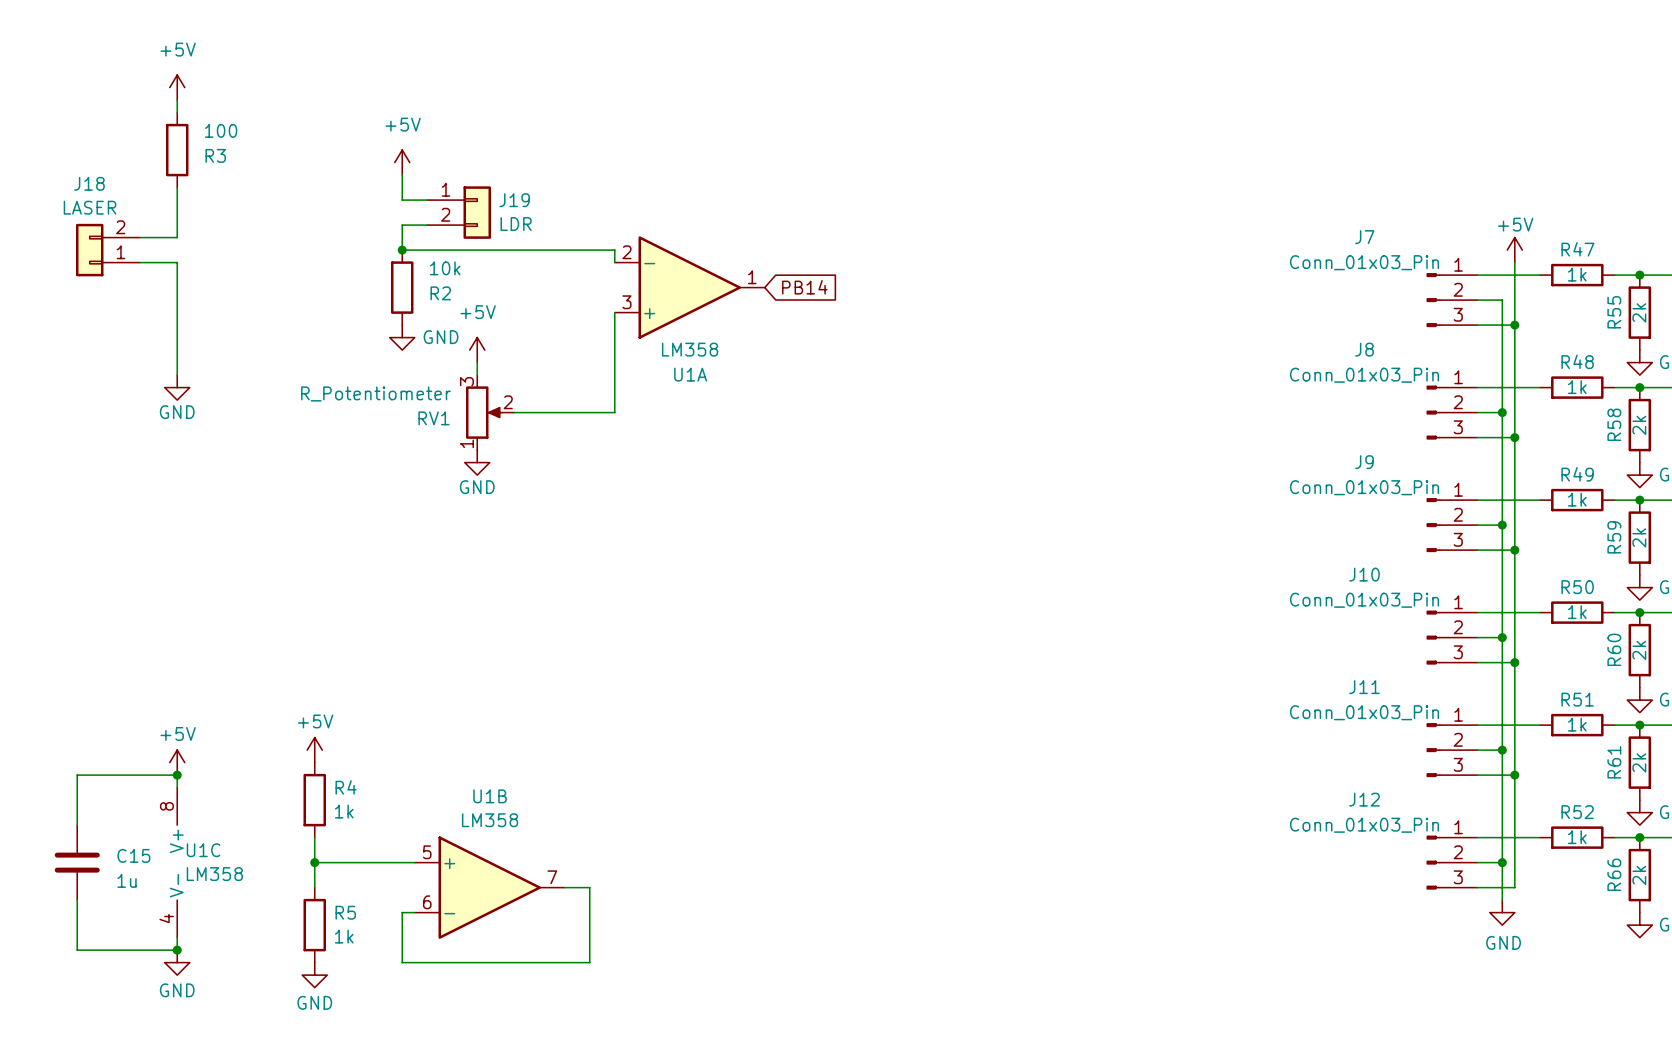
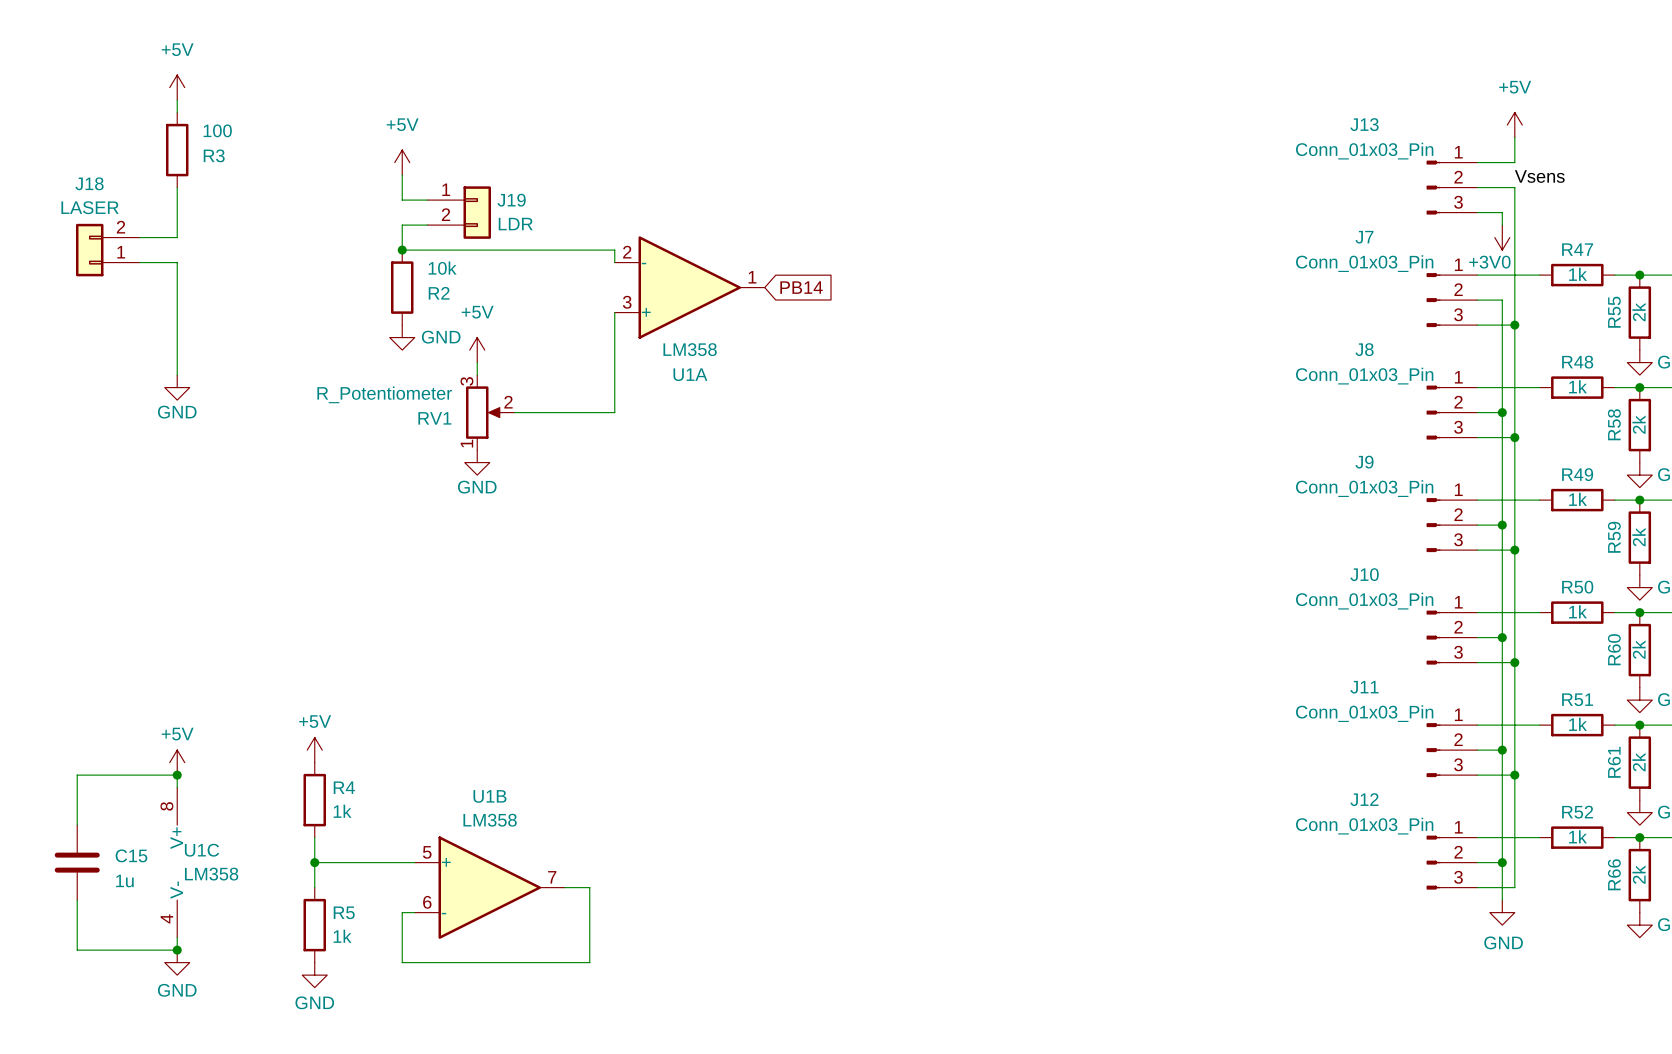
wire: none -> (1514, 137) (1514, 162) (1477, 162)
label: none -> Vsens (1539, 176)
J13: none -> Conn_01x03_Pin (1451, 187)
wire: none -> (1477, 187) (1514, 187) (1514, 262)
wire: none -> (1477, 212) (1502, 212) (1502, 225)
power symbol text position: +5V (1515, 224) -> +5V (1515, 87)
power symbol: none -> +3V0 (1502, 237)
power symbol position: +5V (1514, 250) -> +5V (1514, 125)

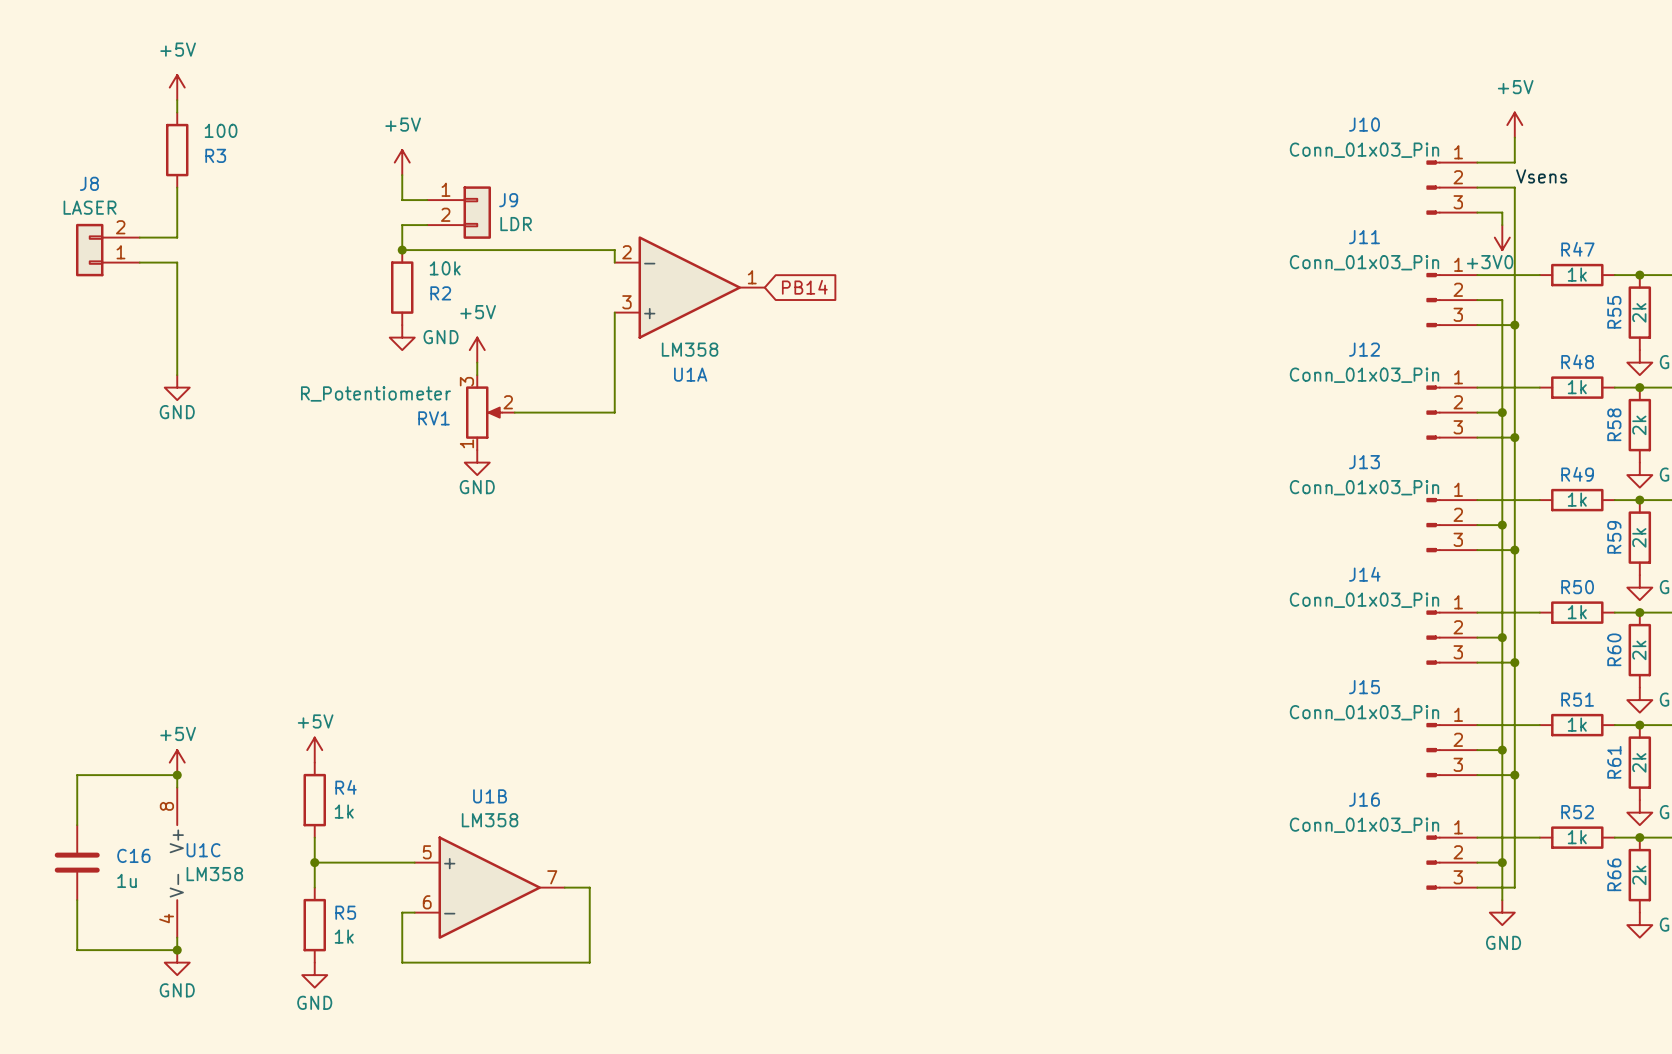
J13 name: J13 (1364, 124) -> J10 (1364, 124)
J18 name: J18 (89, 183) -> J8 (89, 183)
J19 name: J19 (511, 200) -> J9 (508, 200)
J7 name: J7 (1364, 237) -> J11 (1364, 237)
J8 name: J8 (1364, 349) -> J12 (1364, 349)
J9 name: J9 (1364, 462) -> J13 (1364, 462)
J10 name: J10 (1364, 574) -> J14 (1364, 574)
J11 name: J11 (1364, 687) -> J15 (1364, 687)
J12 name: J12 (1364, 799) -> J16 (1364, 799)
C15 name: C15 (131, 855) -> C16 (133, 855)

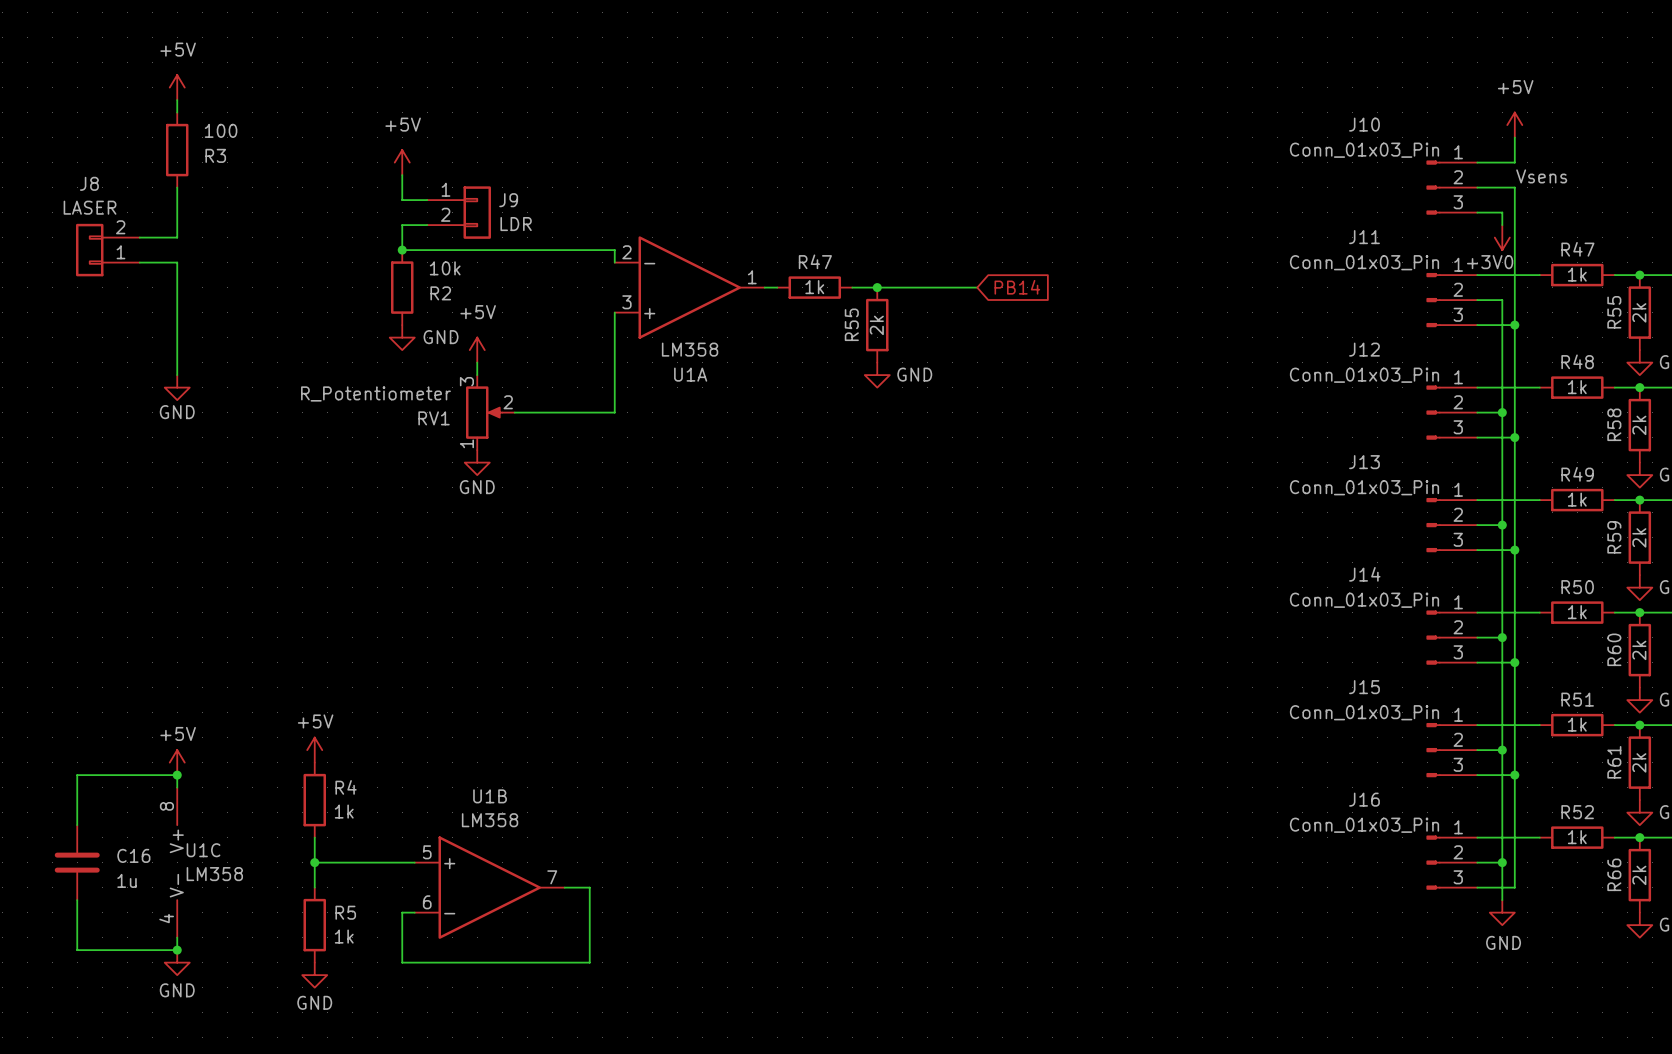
wire: none -> (764, 287) (777, 287)
global label position: PB14 (804, 287) -> PB14 (1017, 287)
R47: none -> 1k (814, 287)
wire: none -> (852, 287) (977, 287)
junction: none -> (877, 287)
R55: none -> 2k (877, 325)
power symbol: none -> GND (877, 375)

